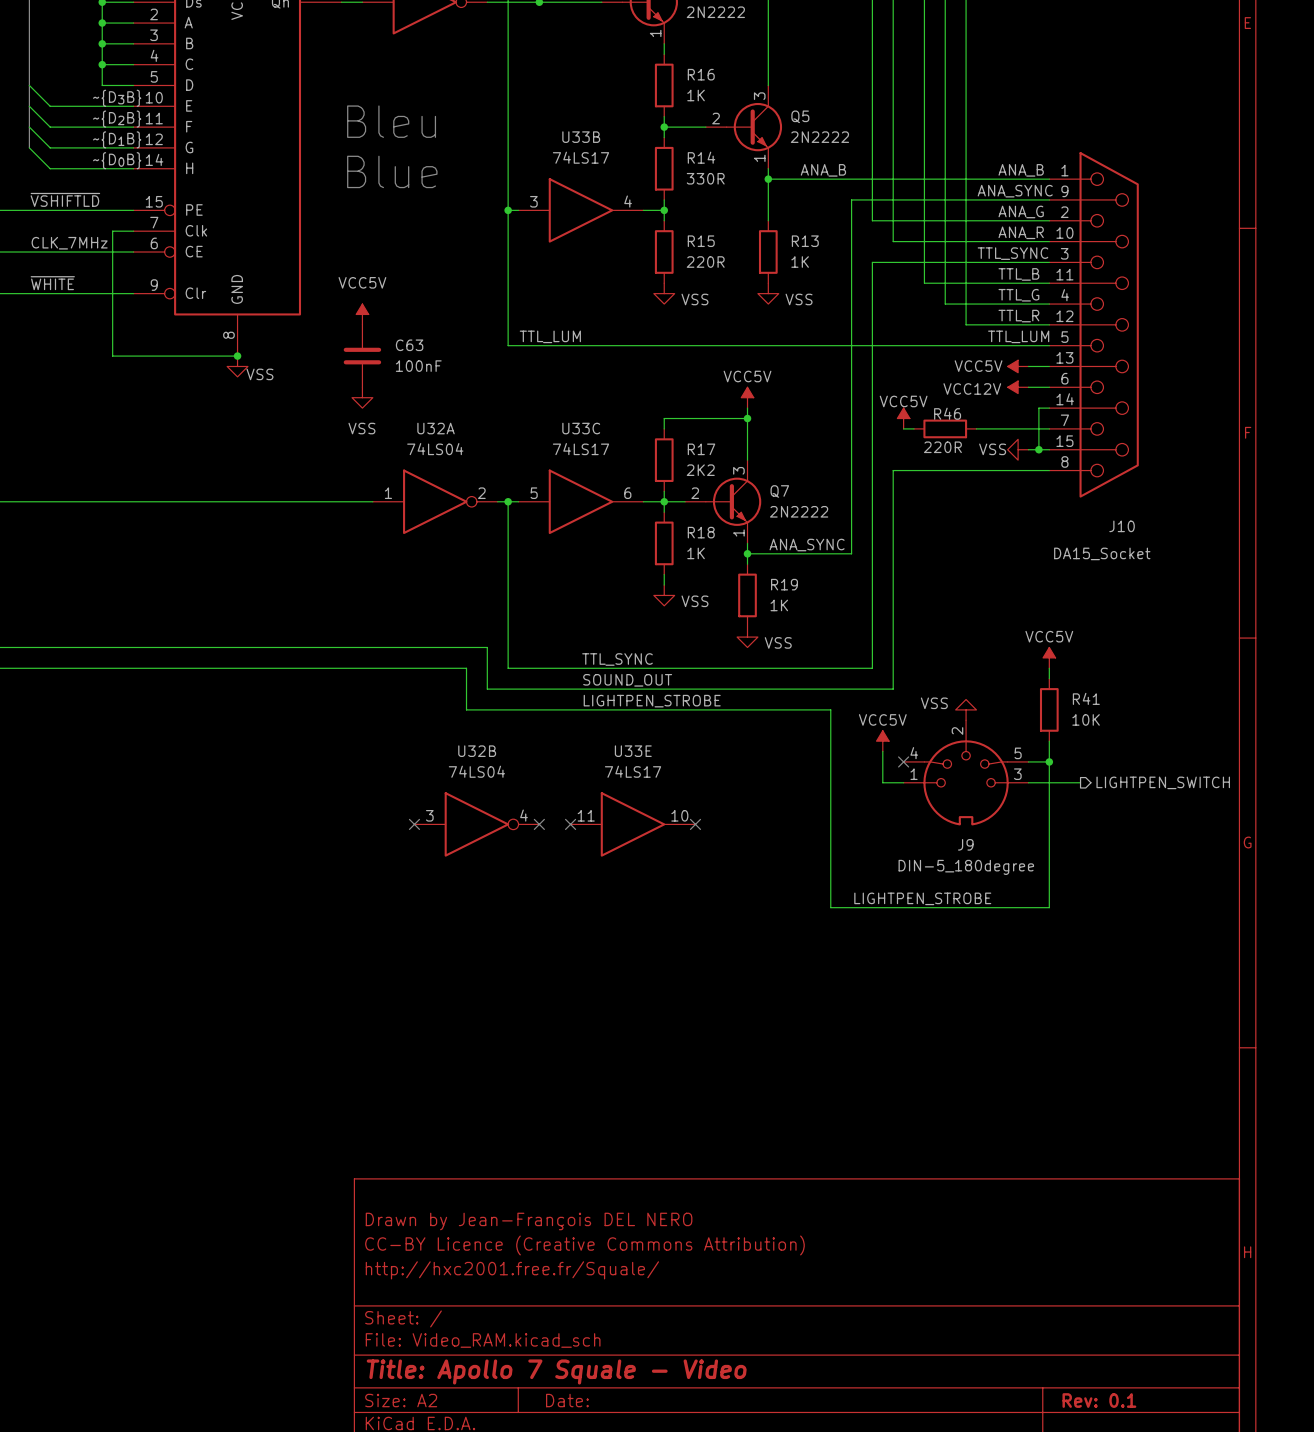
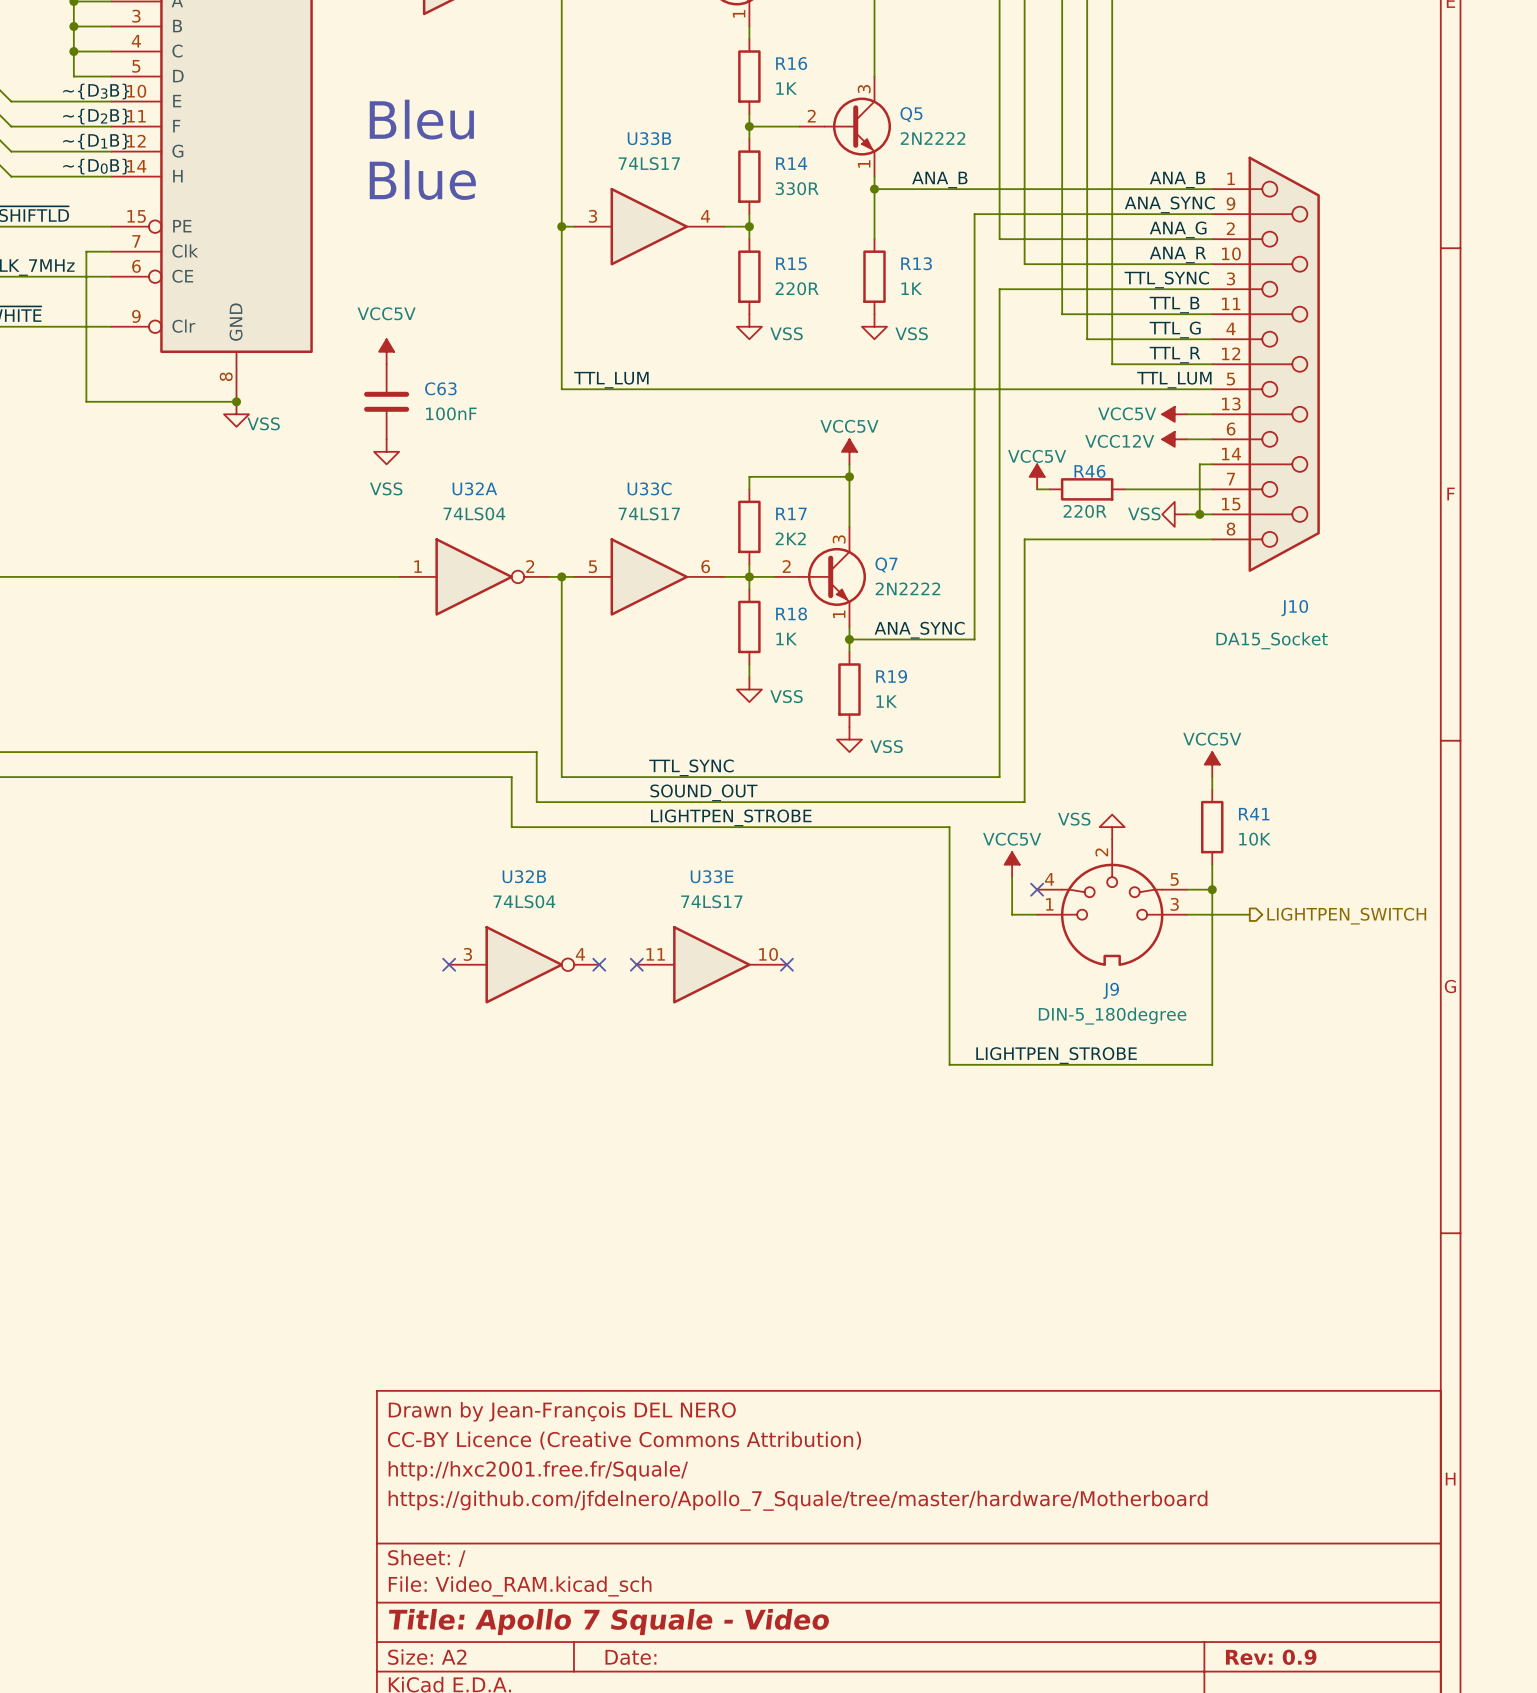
title block: none -> Drawn by Jean-François DEL NERO (562, 1411)
title block: Drawn by Jean-François DEL NERO (529, 1221) -> CC-BY Licence (Creative Commons Attribution) (624, 1440)
title block: CC-BY Licence (Creative Commons Attribution) (584, 1245) -> http://hxc2001.free.fr/Squale/ (538, 1470)
title block: http://hxc2001.free.fr/Squale/ (512, 1270) -> https://github.com/jfdelnero/Apollo_7_Squale/tree/master/hardware/Motherboard (798, 1500)
title block: Rev: 0.1 (1099, 1400) -> Rev: 0.9 (1271, 1657)

